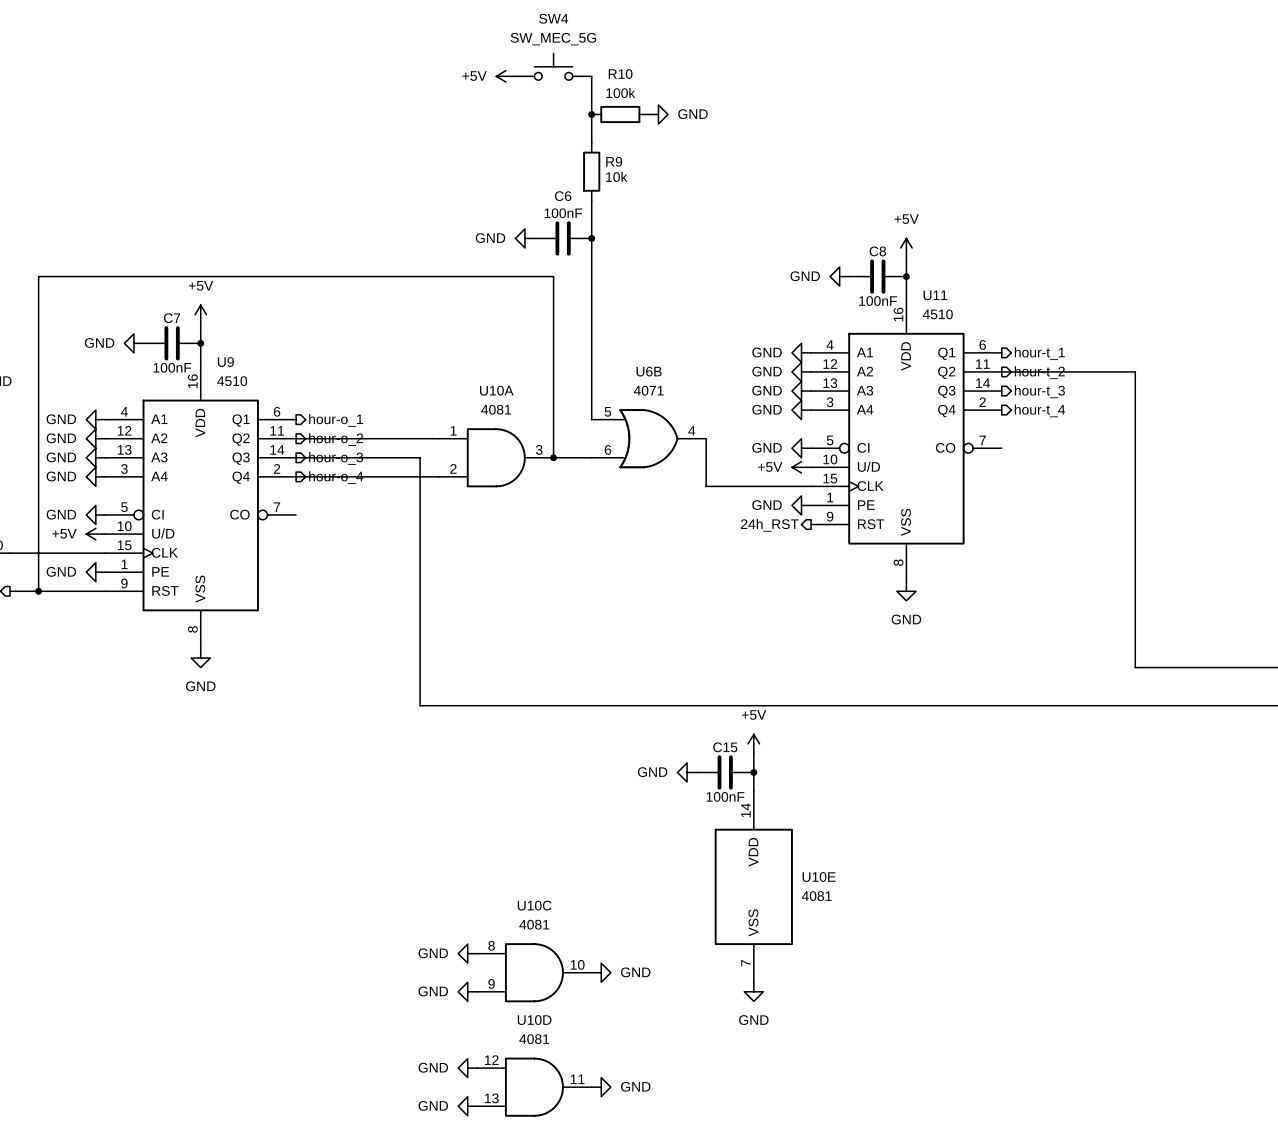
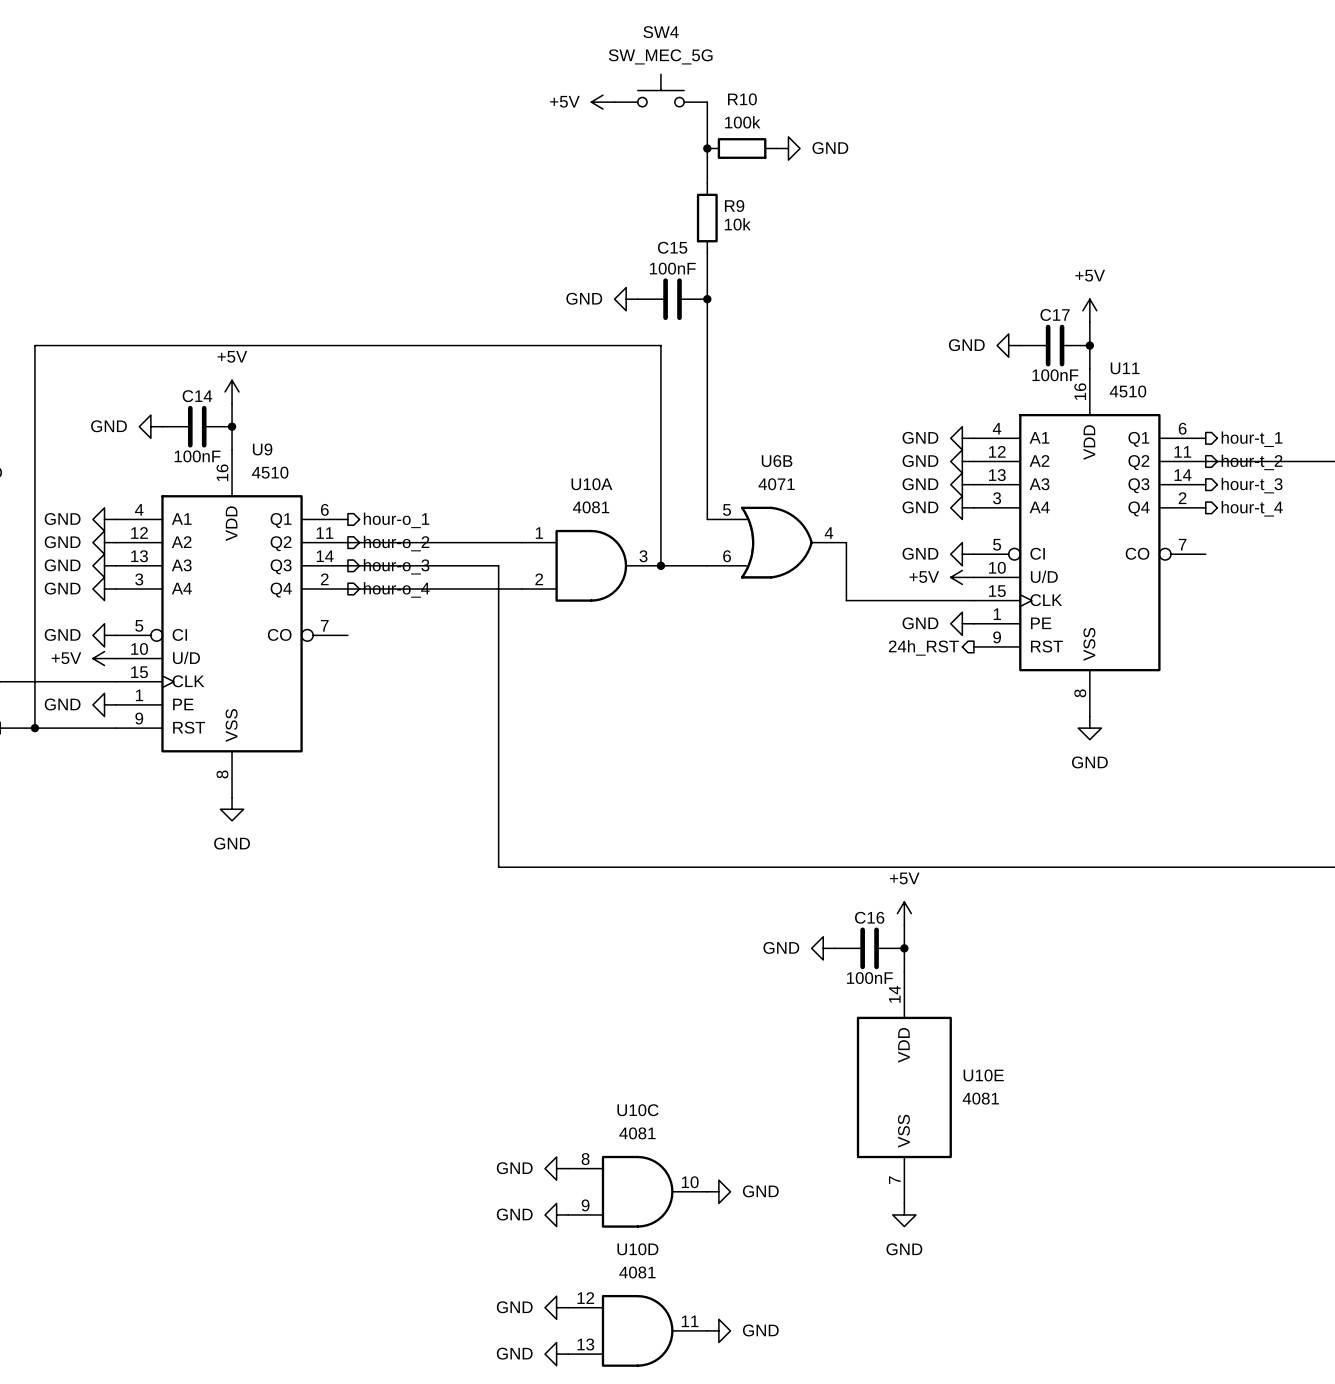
C6 name: C6 (563, 196) -> C15 (672, 247)
C8 name: C8 (877, 251) -> C17 (1055, 314)
C7 name: C7 (172, 318) -> C14 (197, 396)
C15 name: C15 (725, 747) -> C16 (869, 917)

